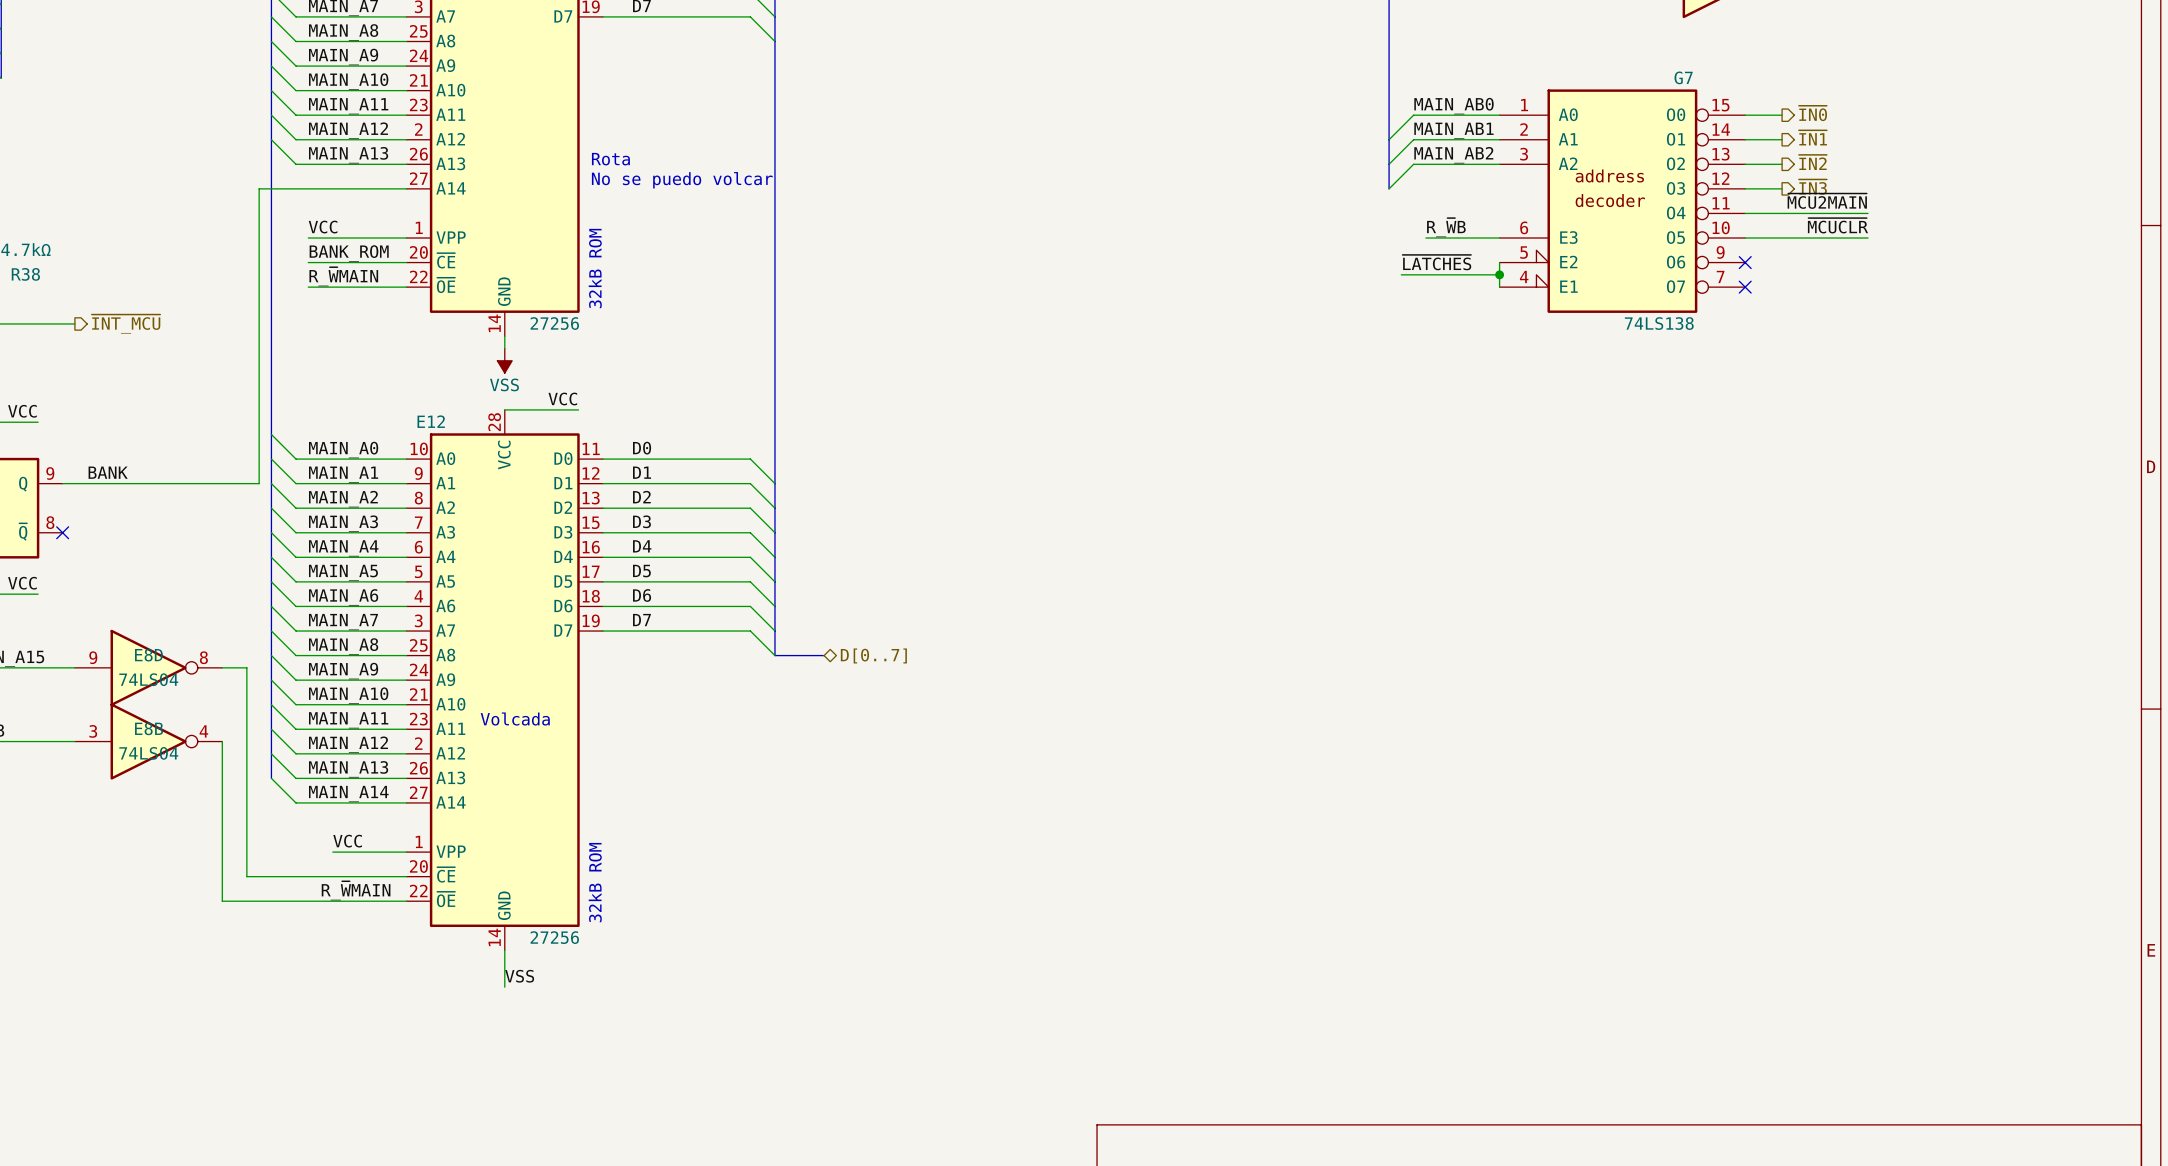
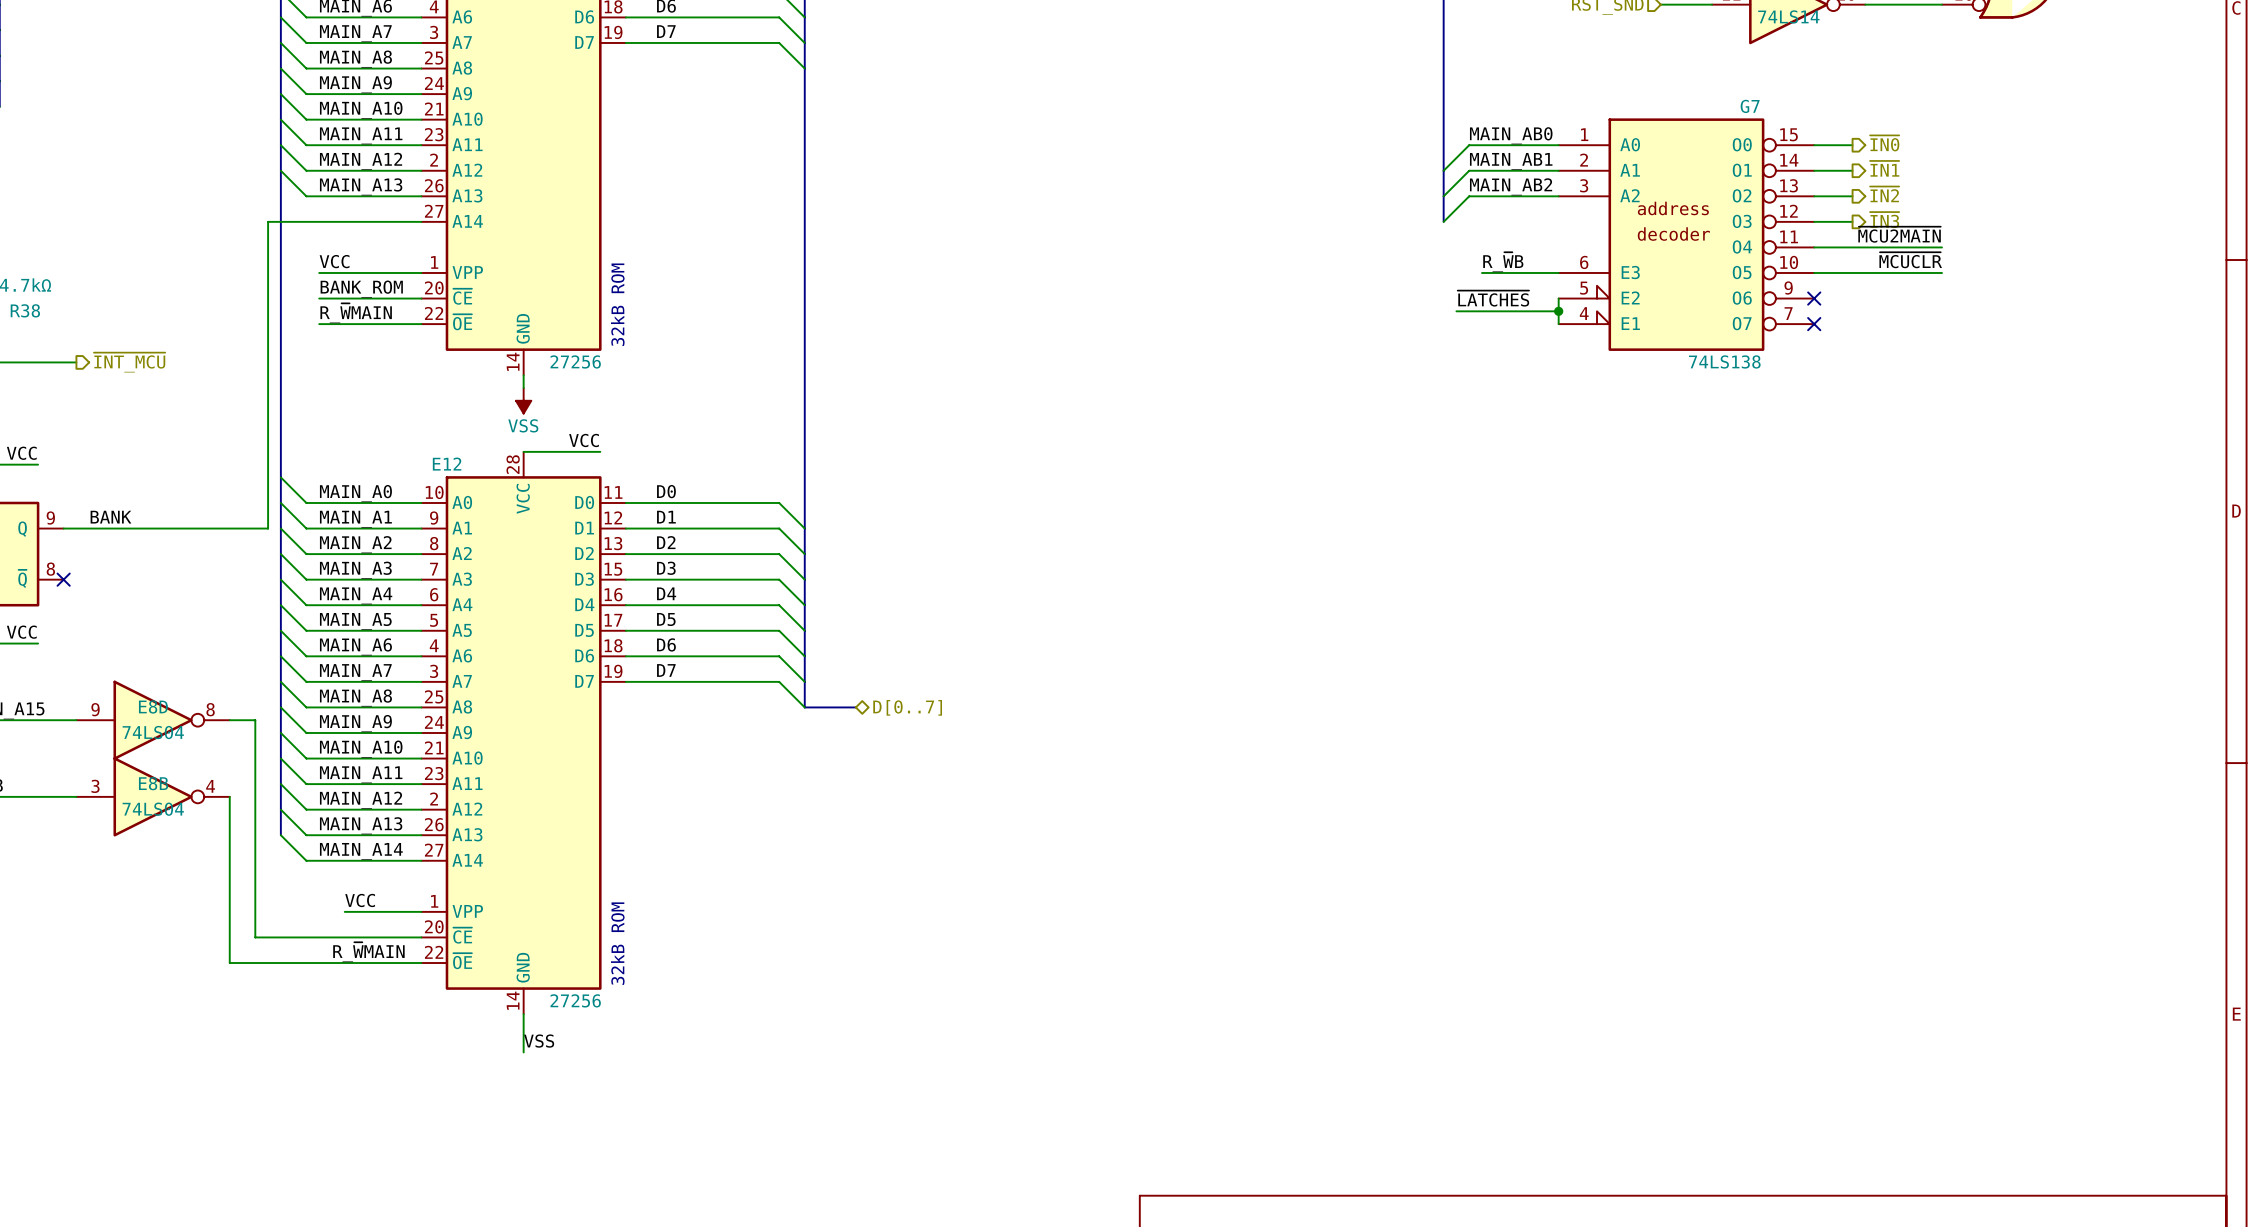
text: Rota (610, 159) -> none
text: No se puedo volcar (682, 180) -> none
text: Volcada (515, 719) -> none

